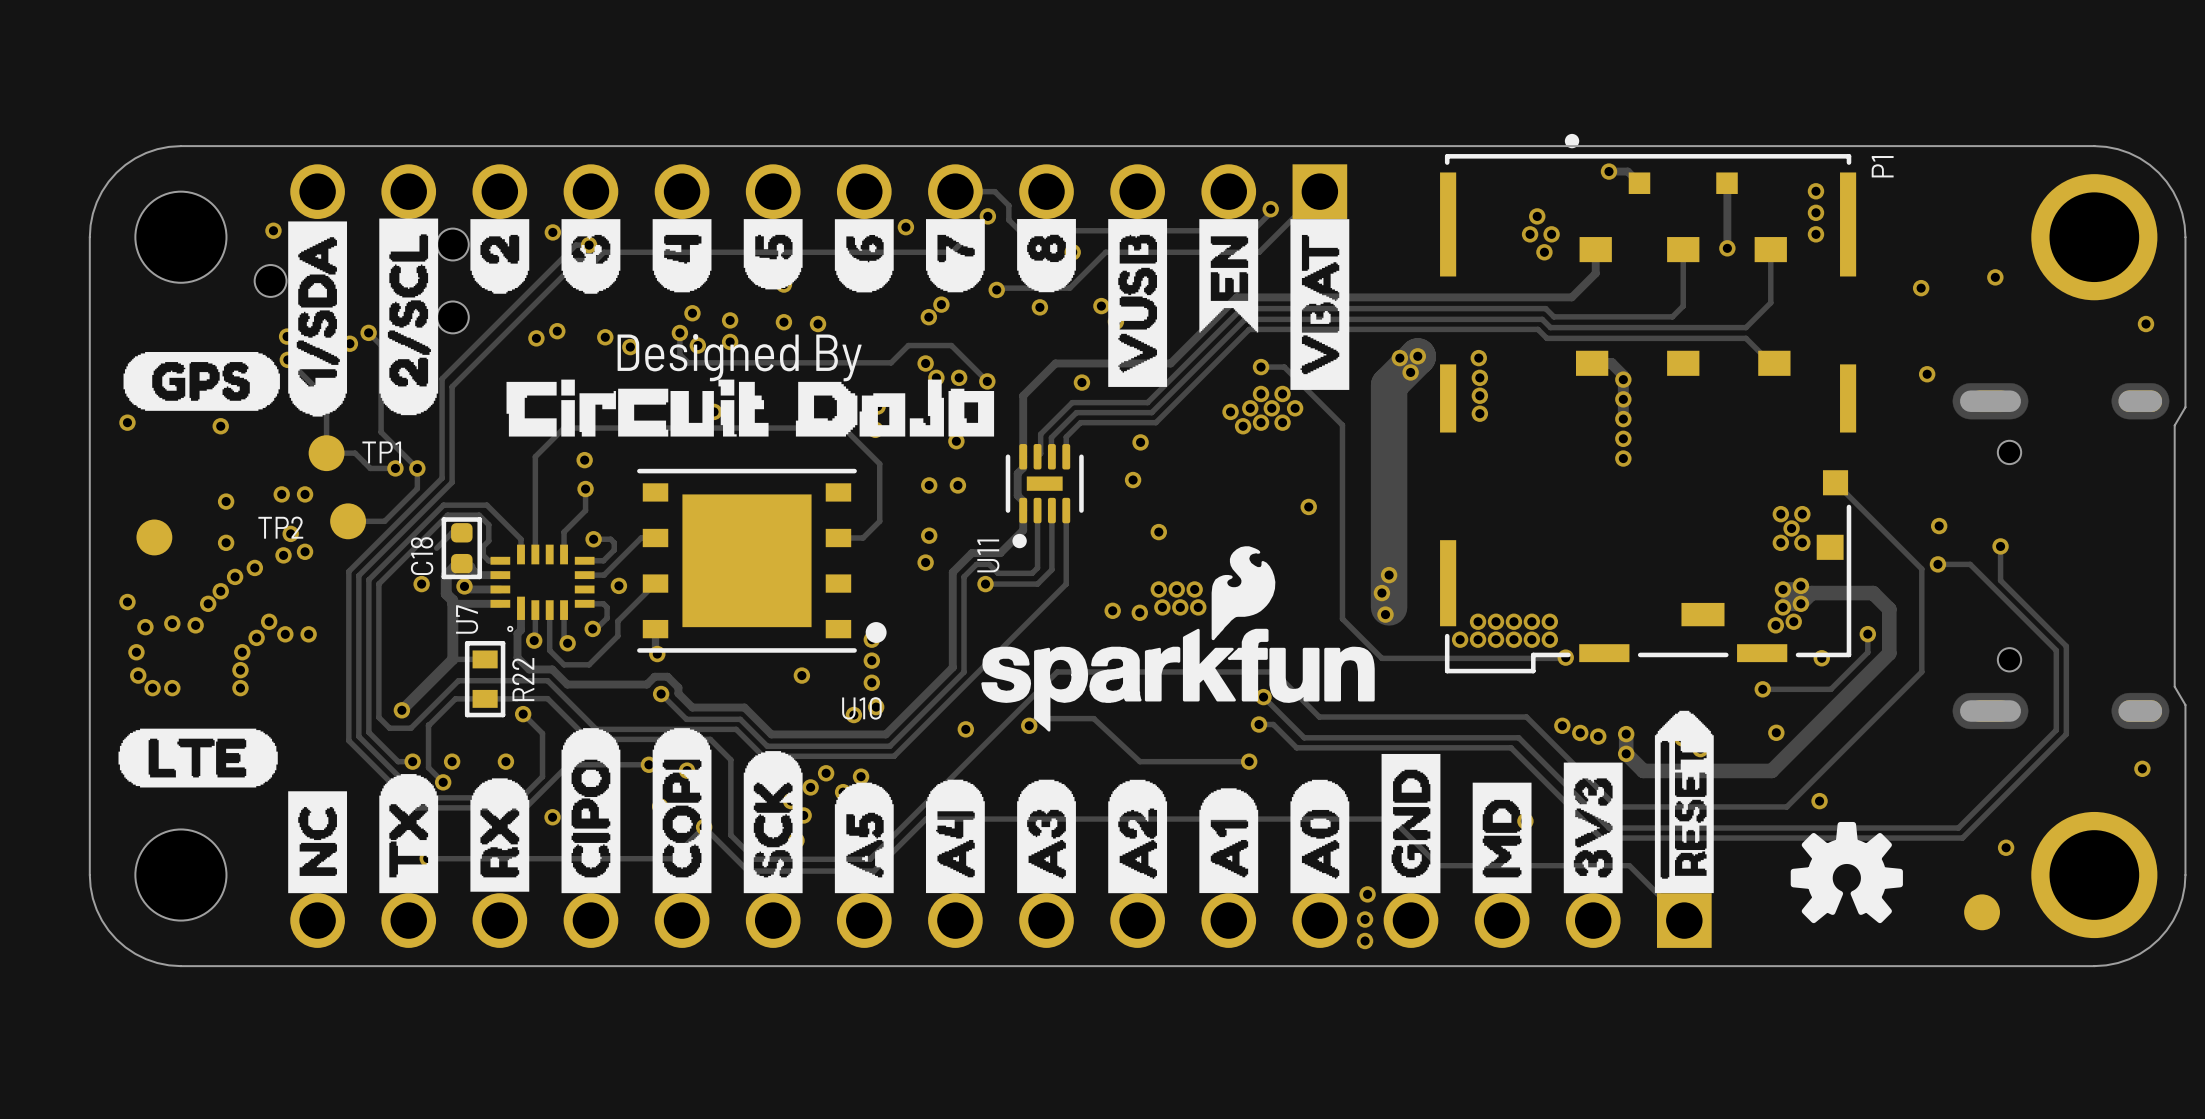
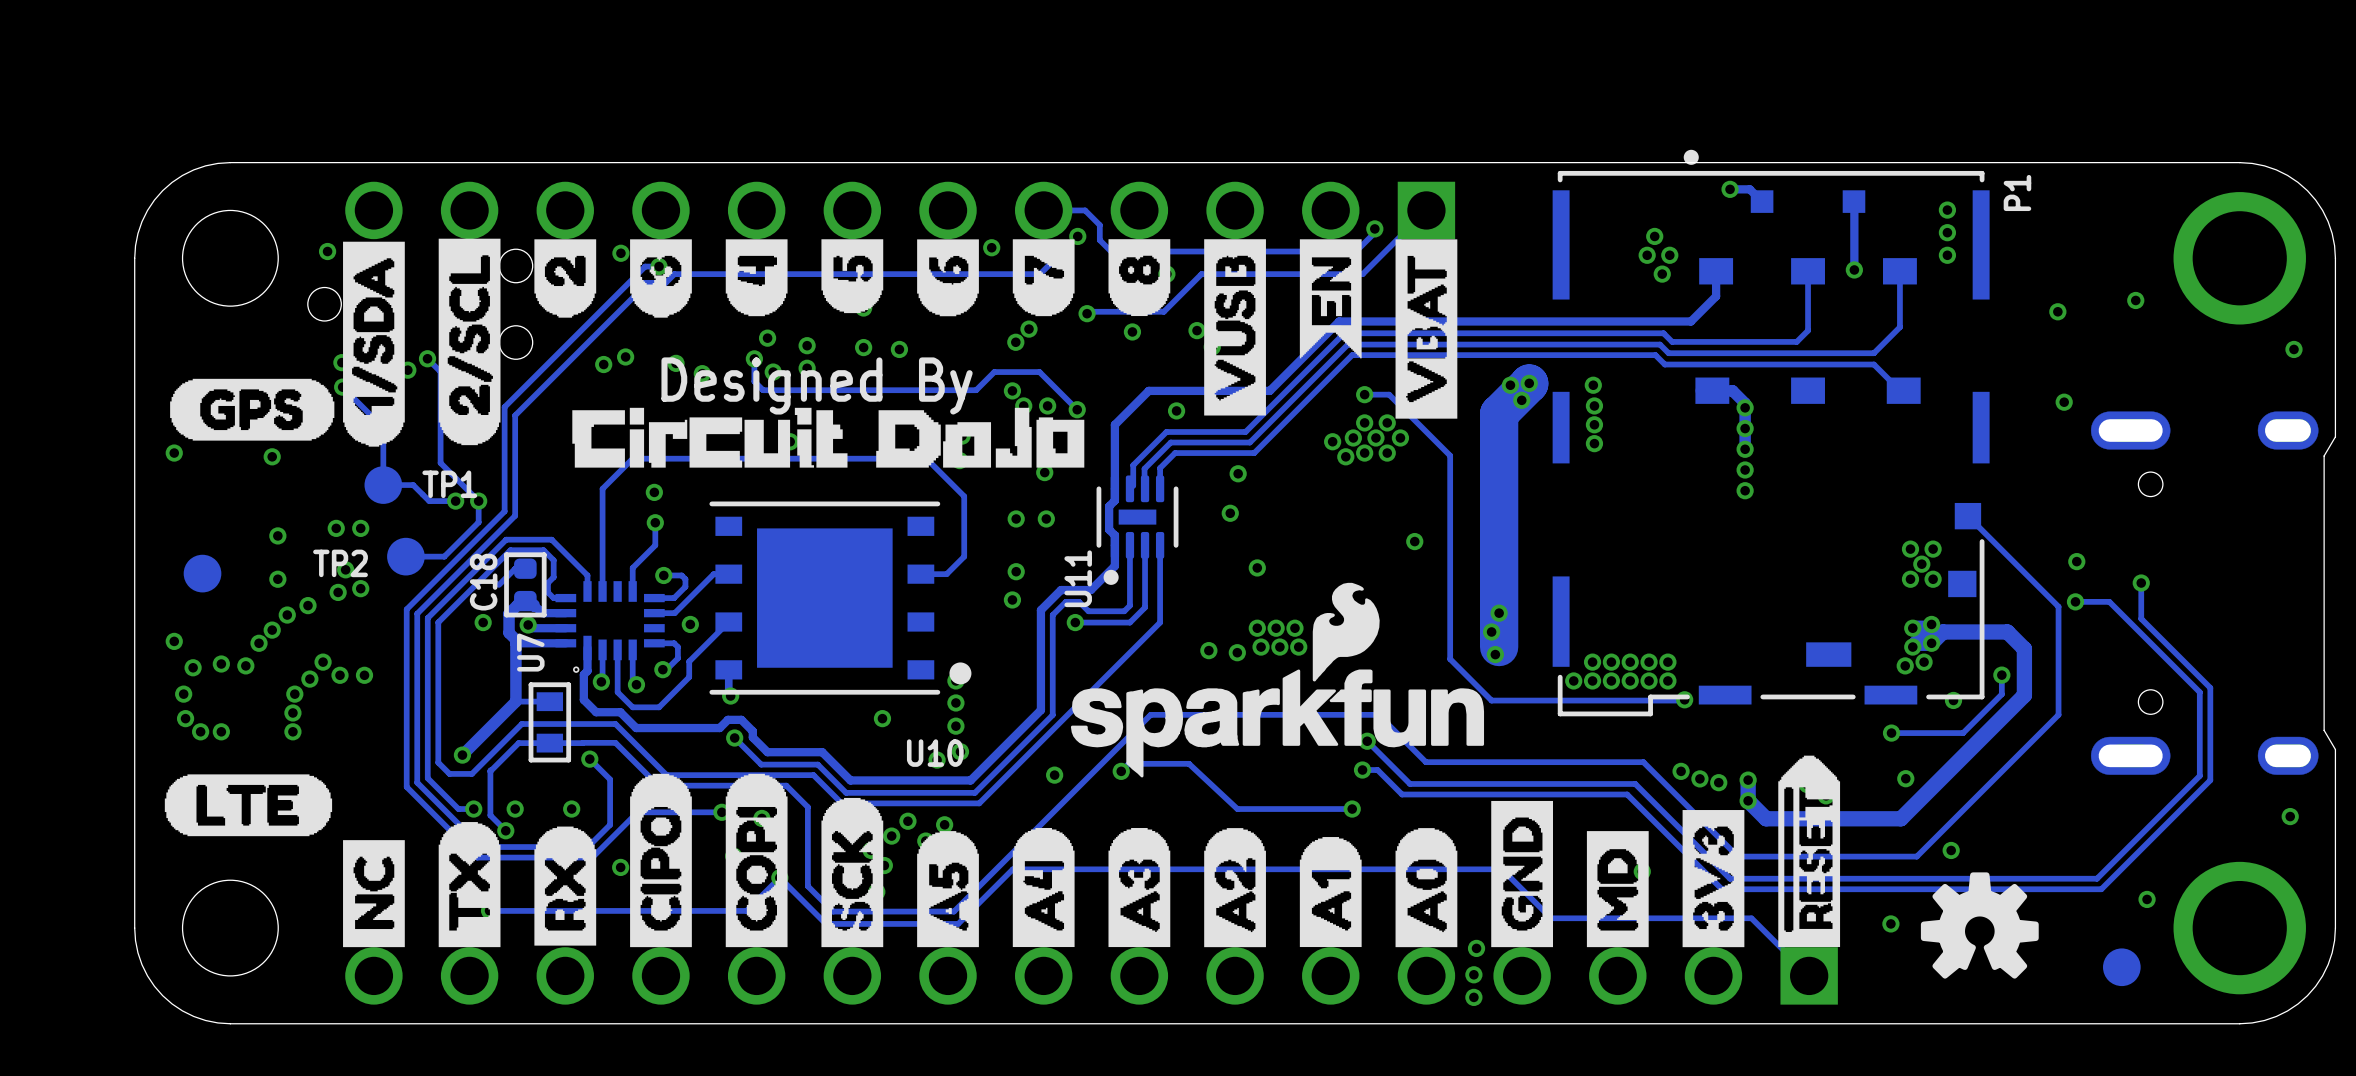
R22 name: R22 (523, 679) -> none
via: none -> (1890, 923)

